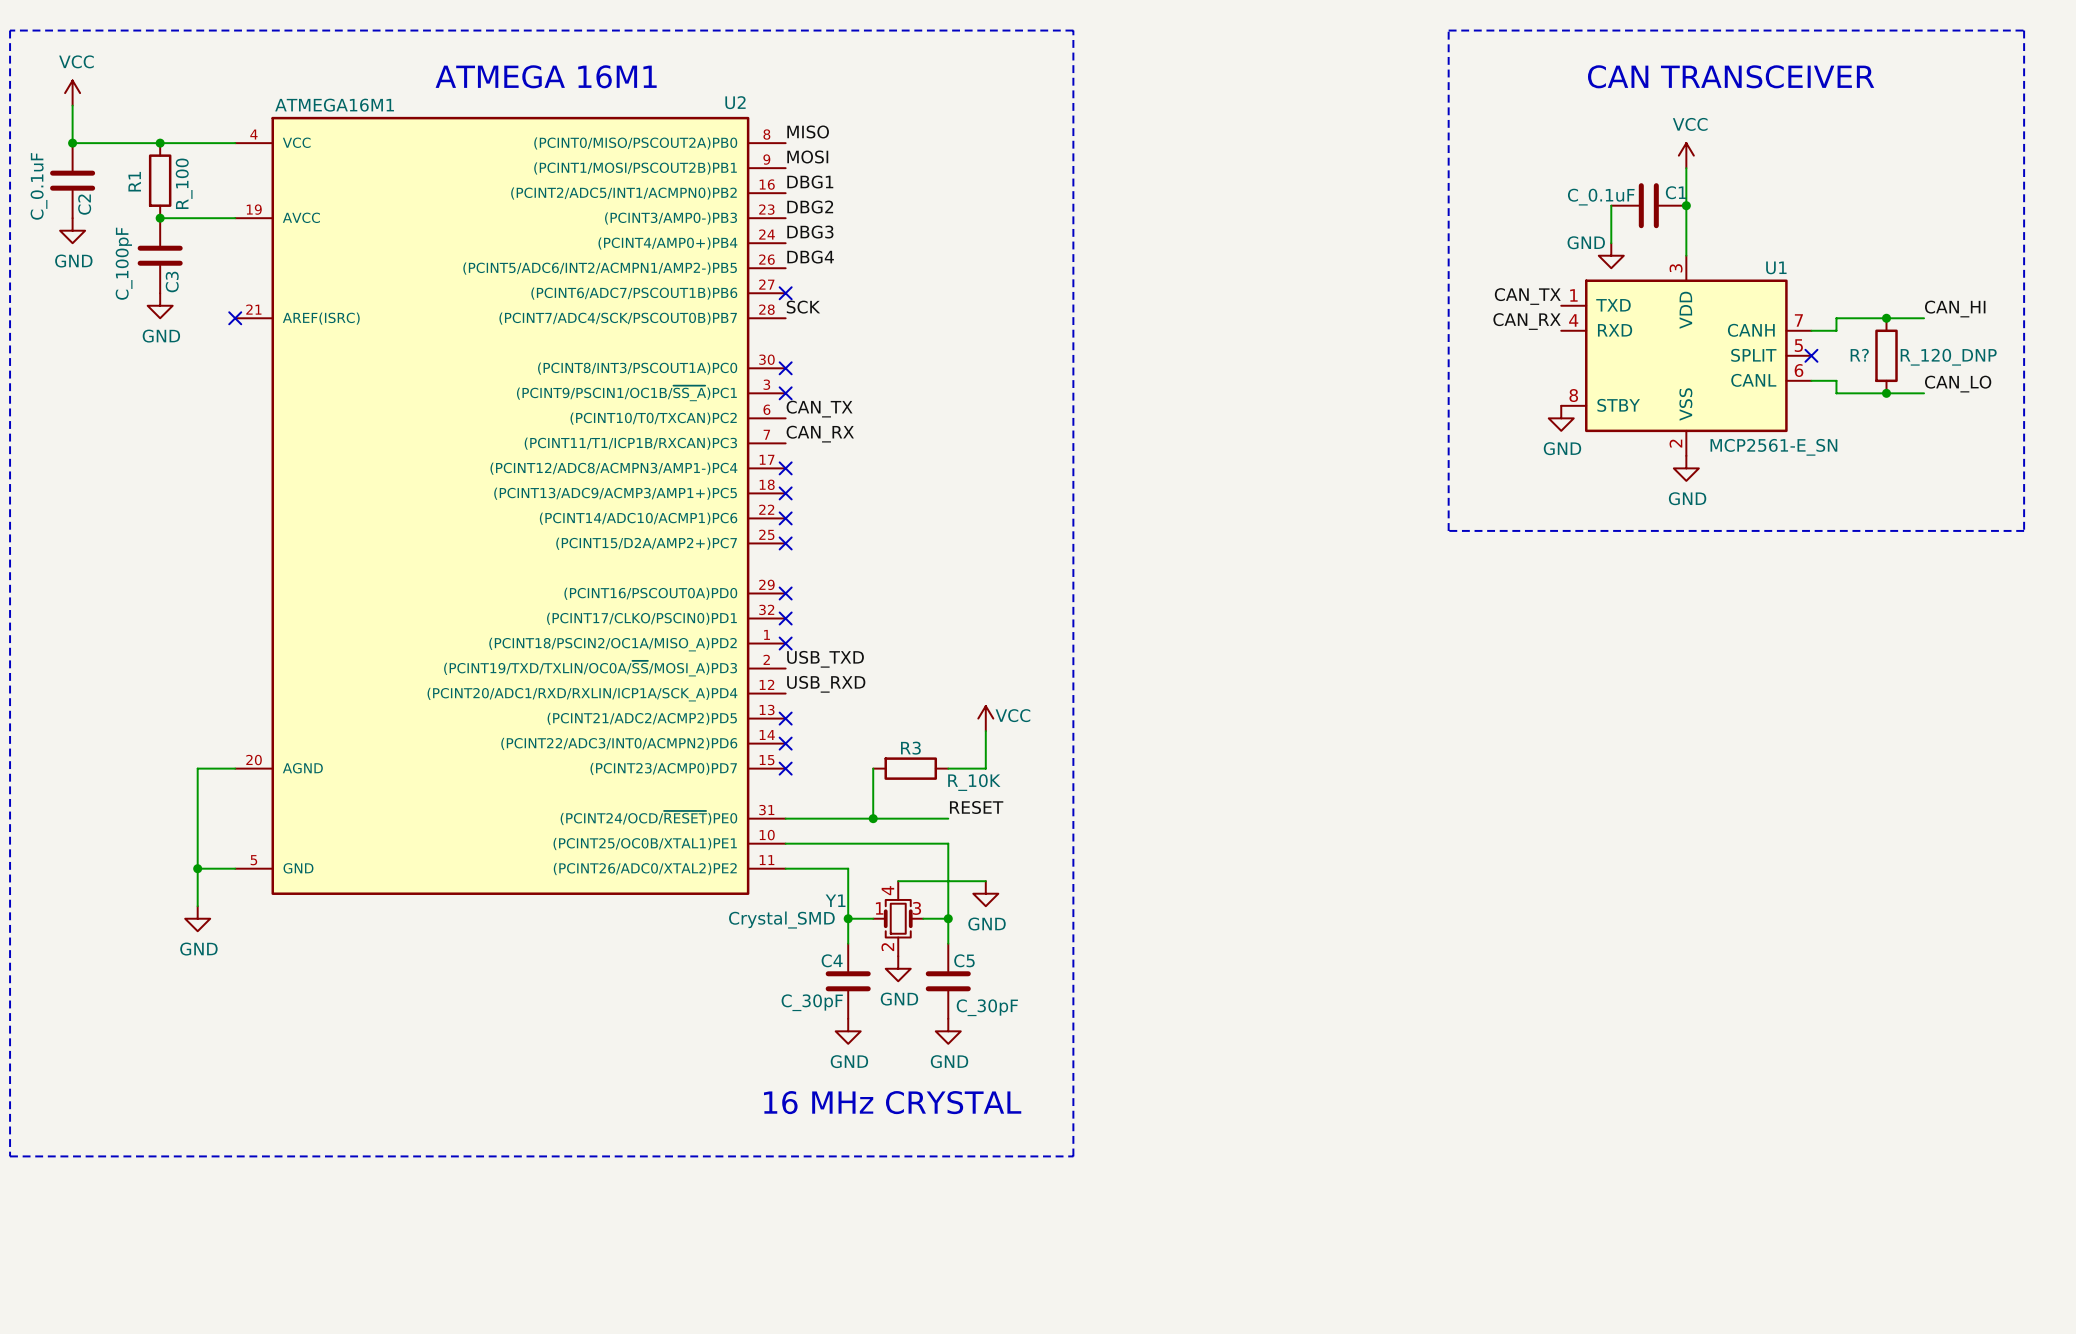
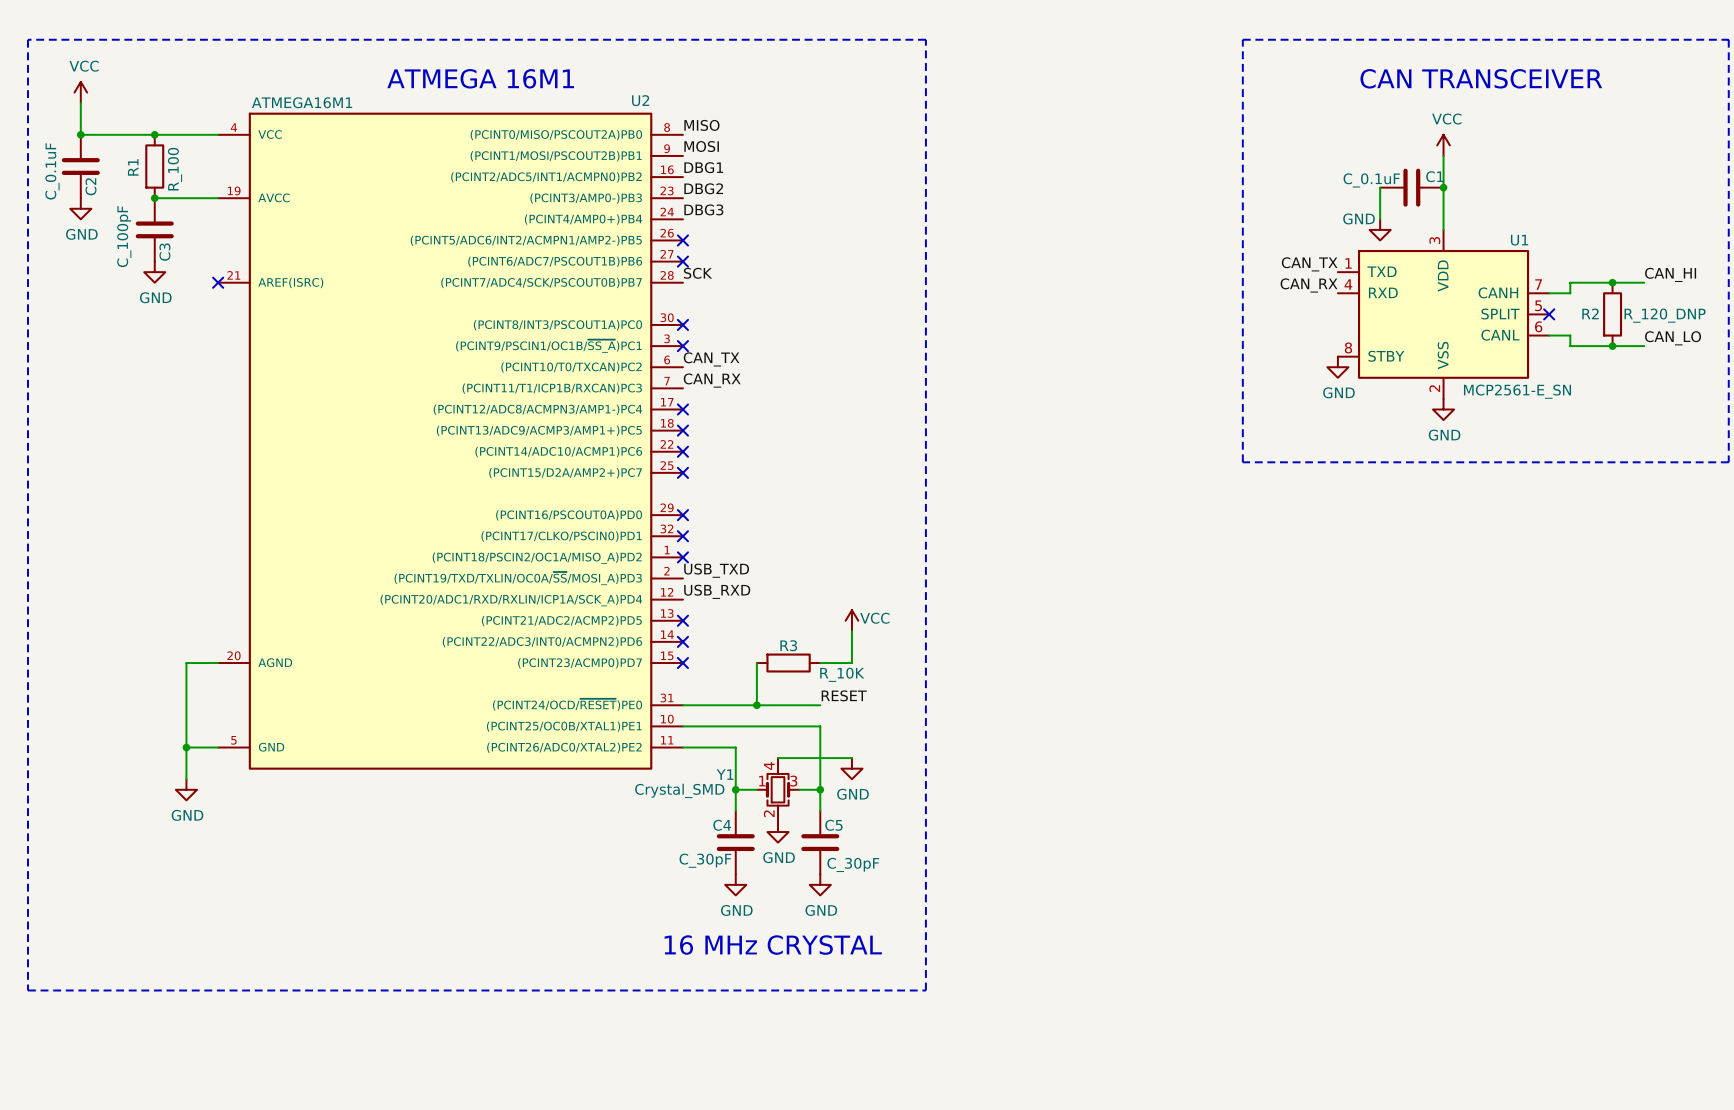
label: DBG4 (810, 257) -> none
no-connect mark: none -> (682, 240)
R? name: R? (1859, 355) -> R2 (1590, 313)

